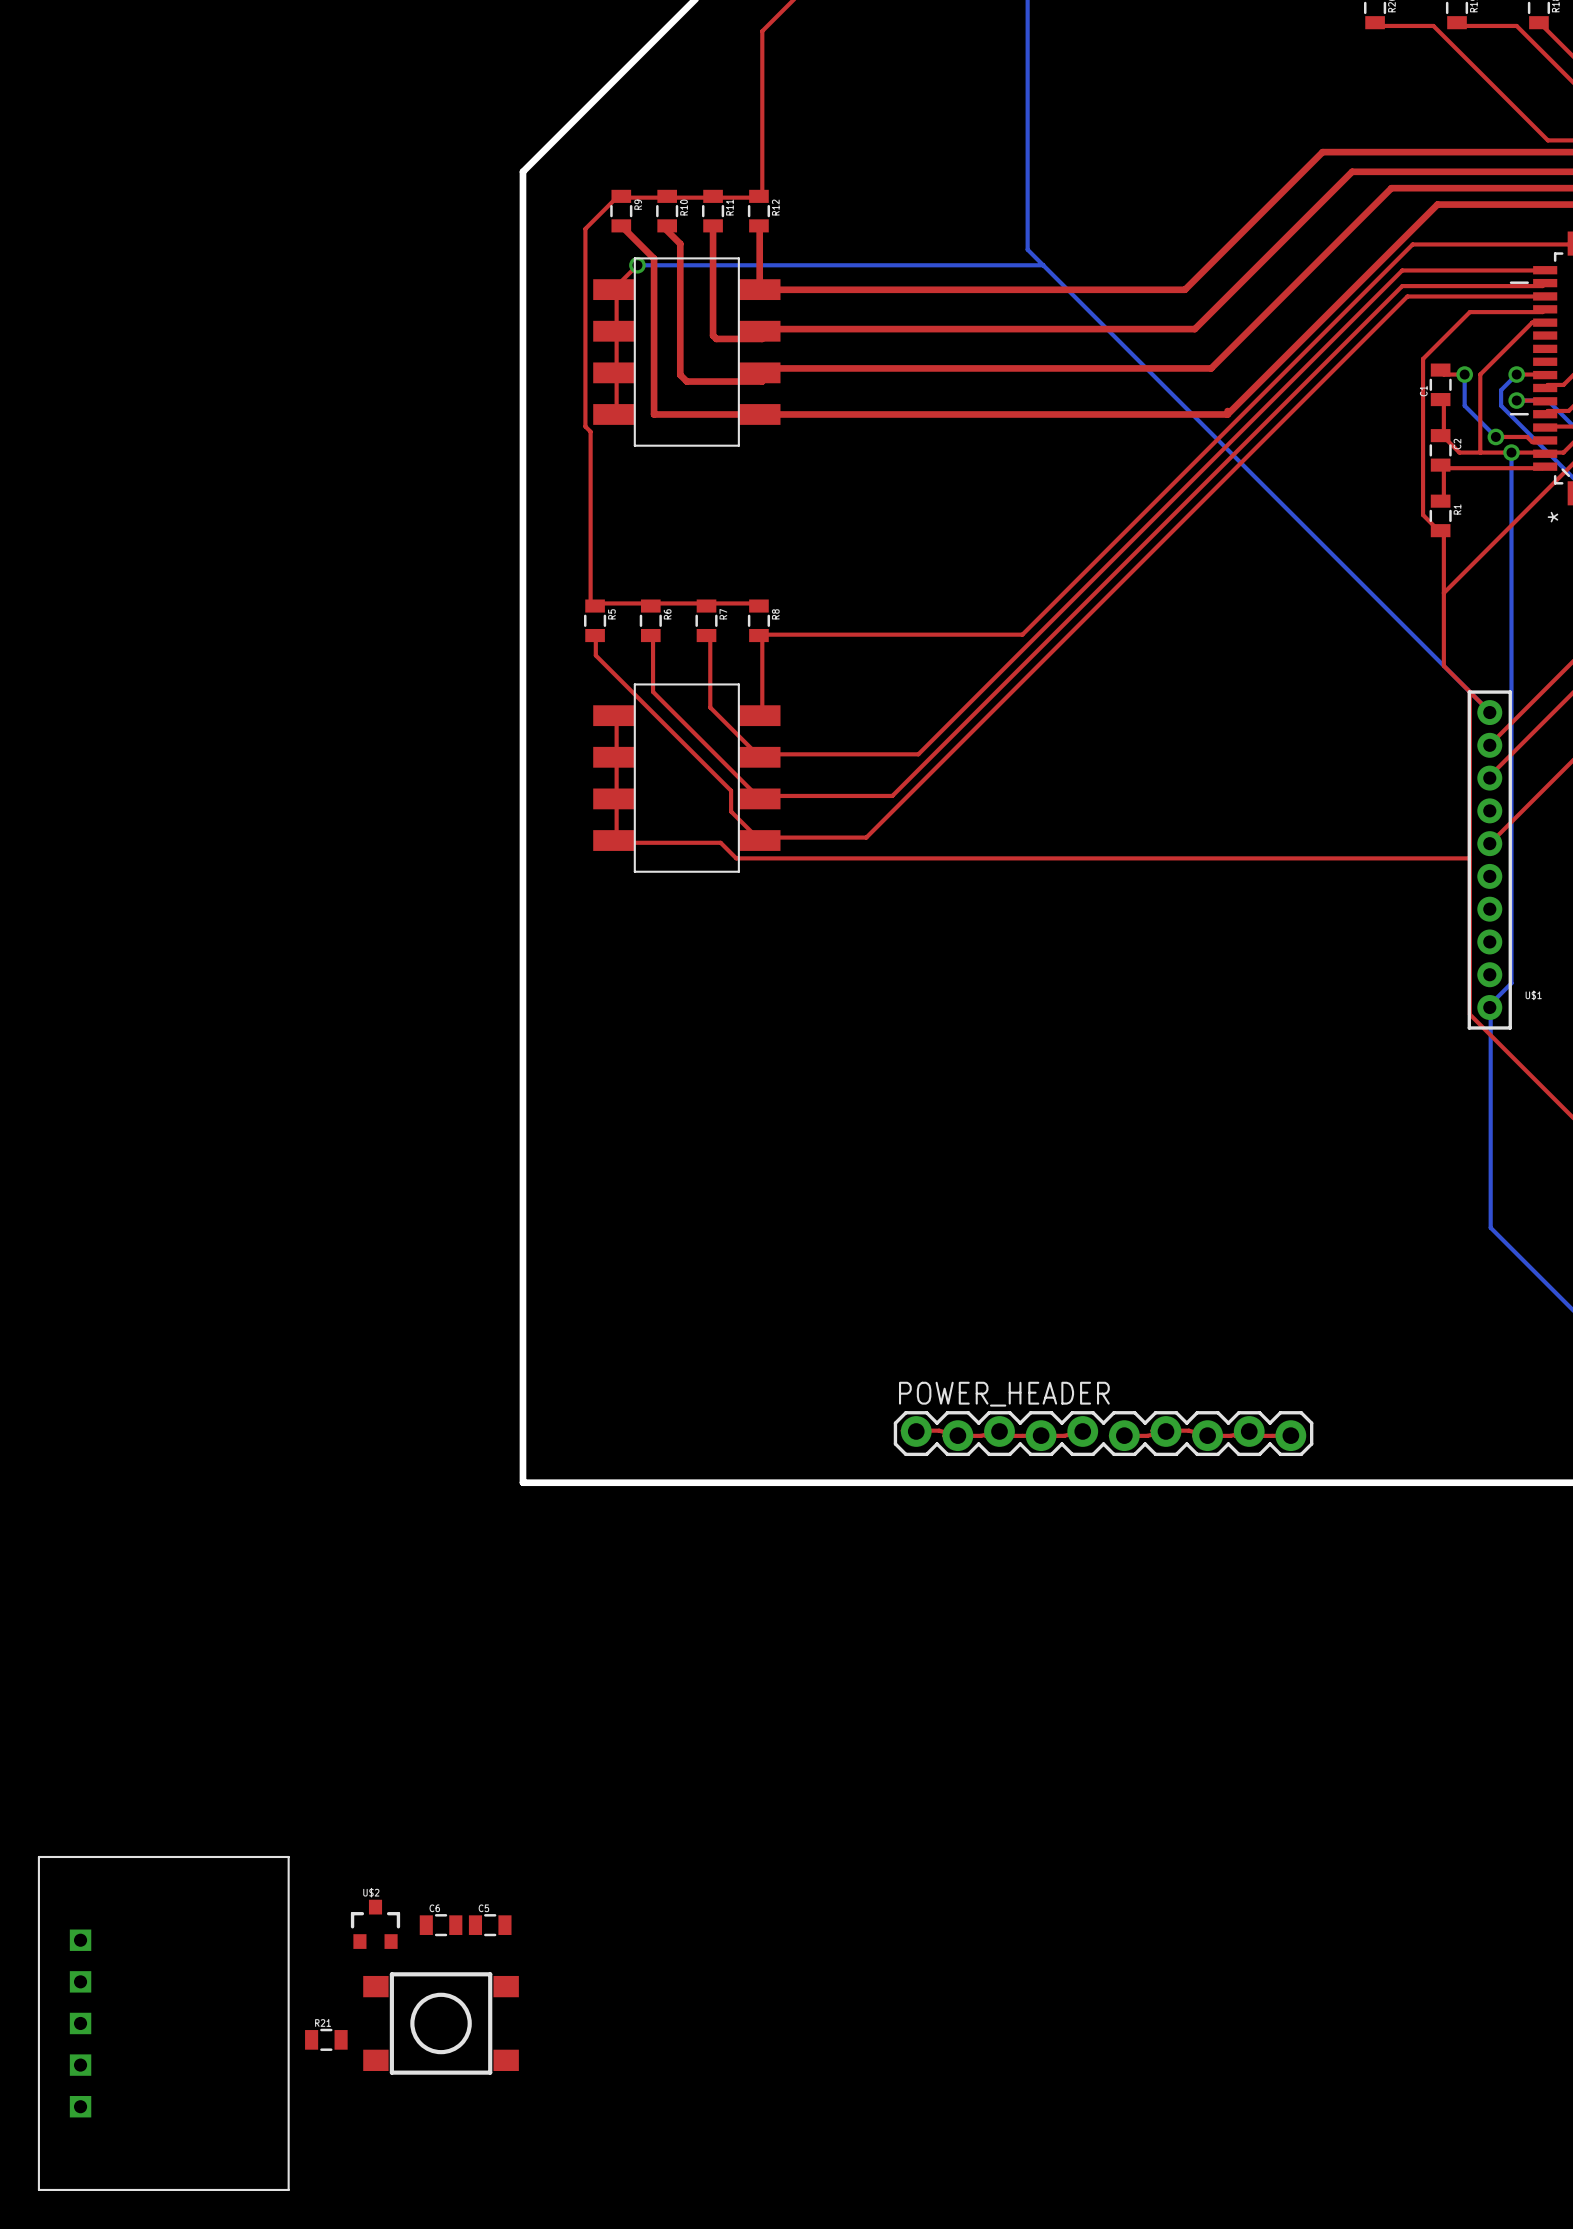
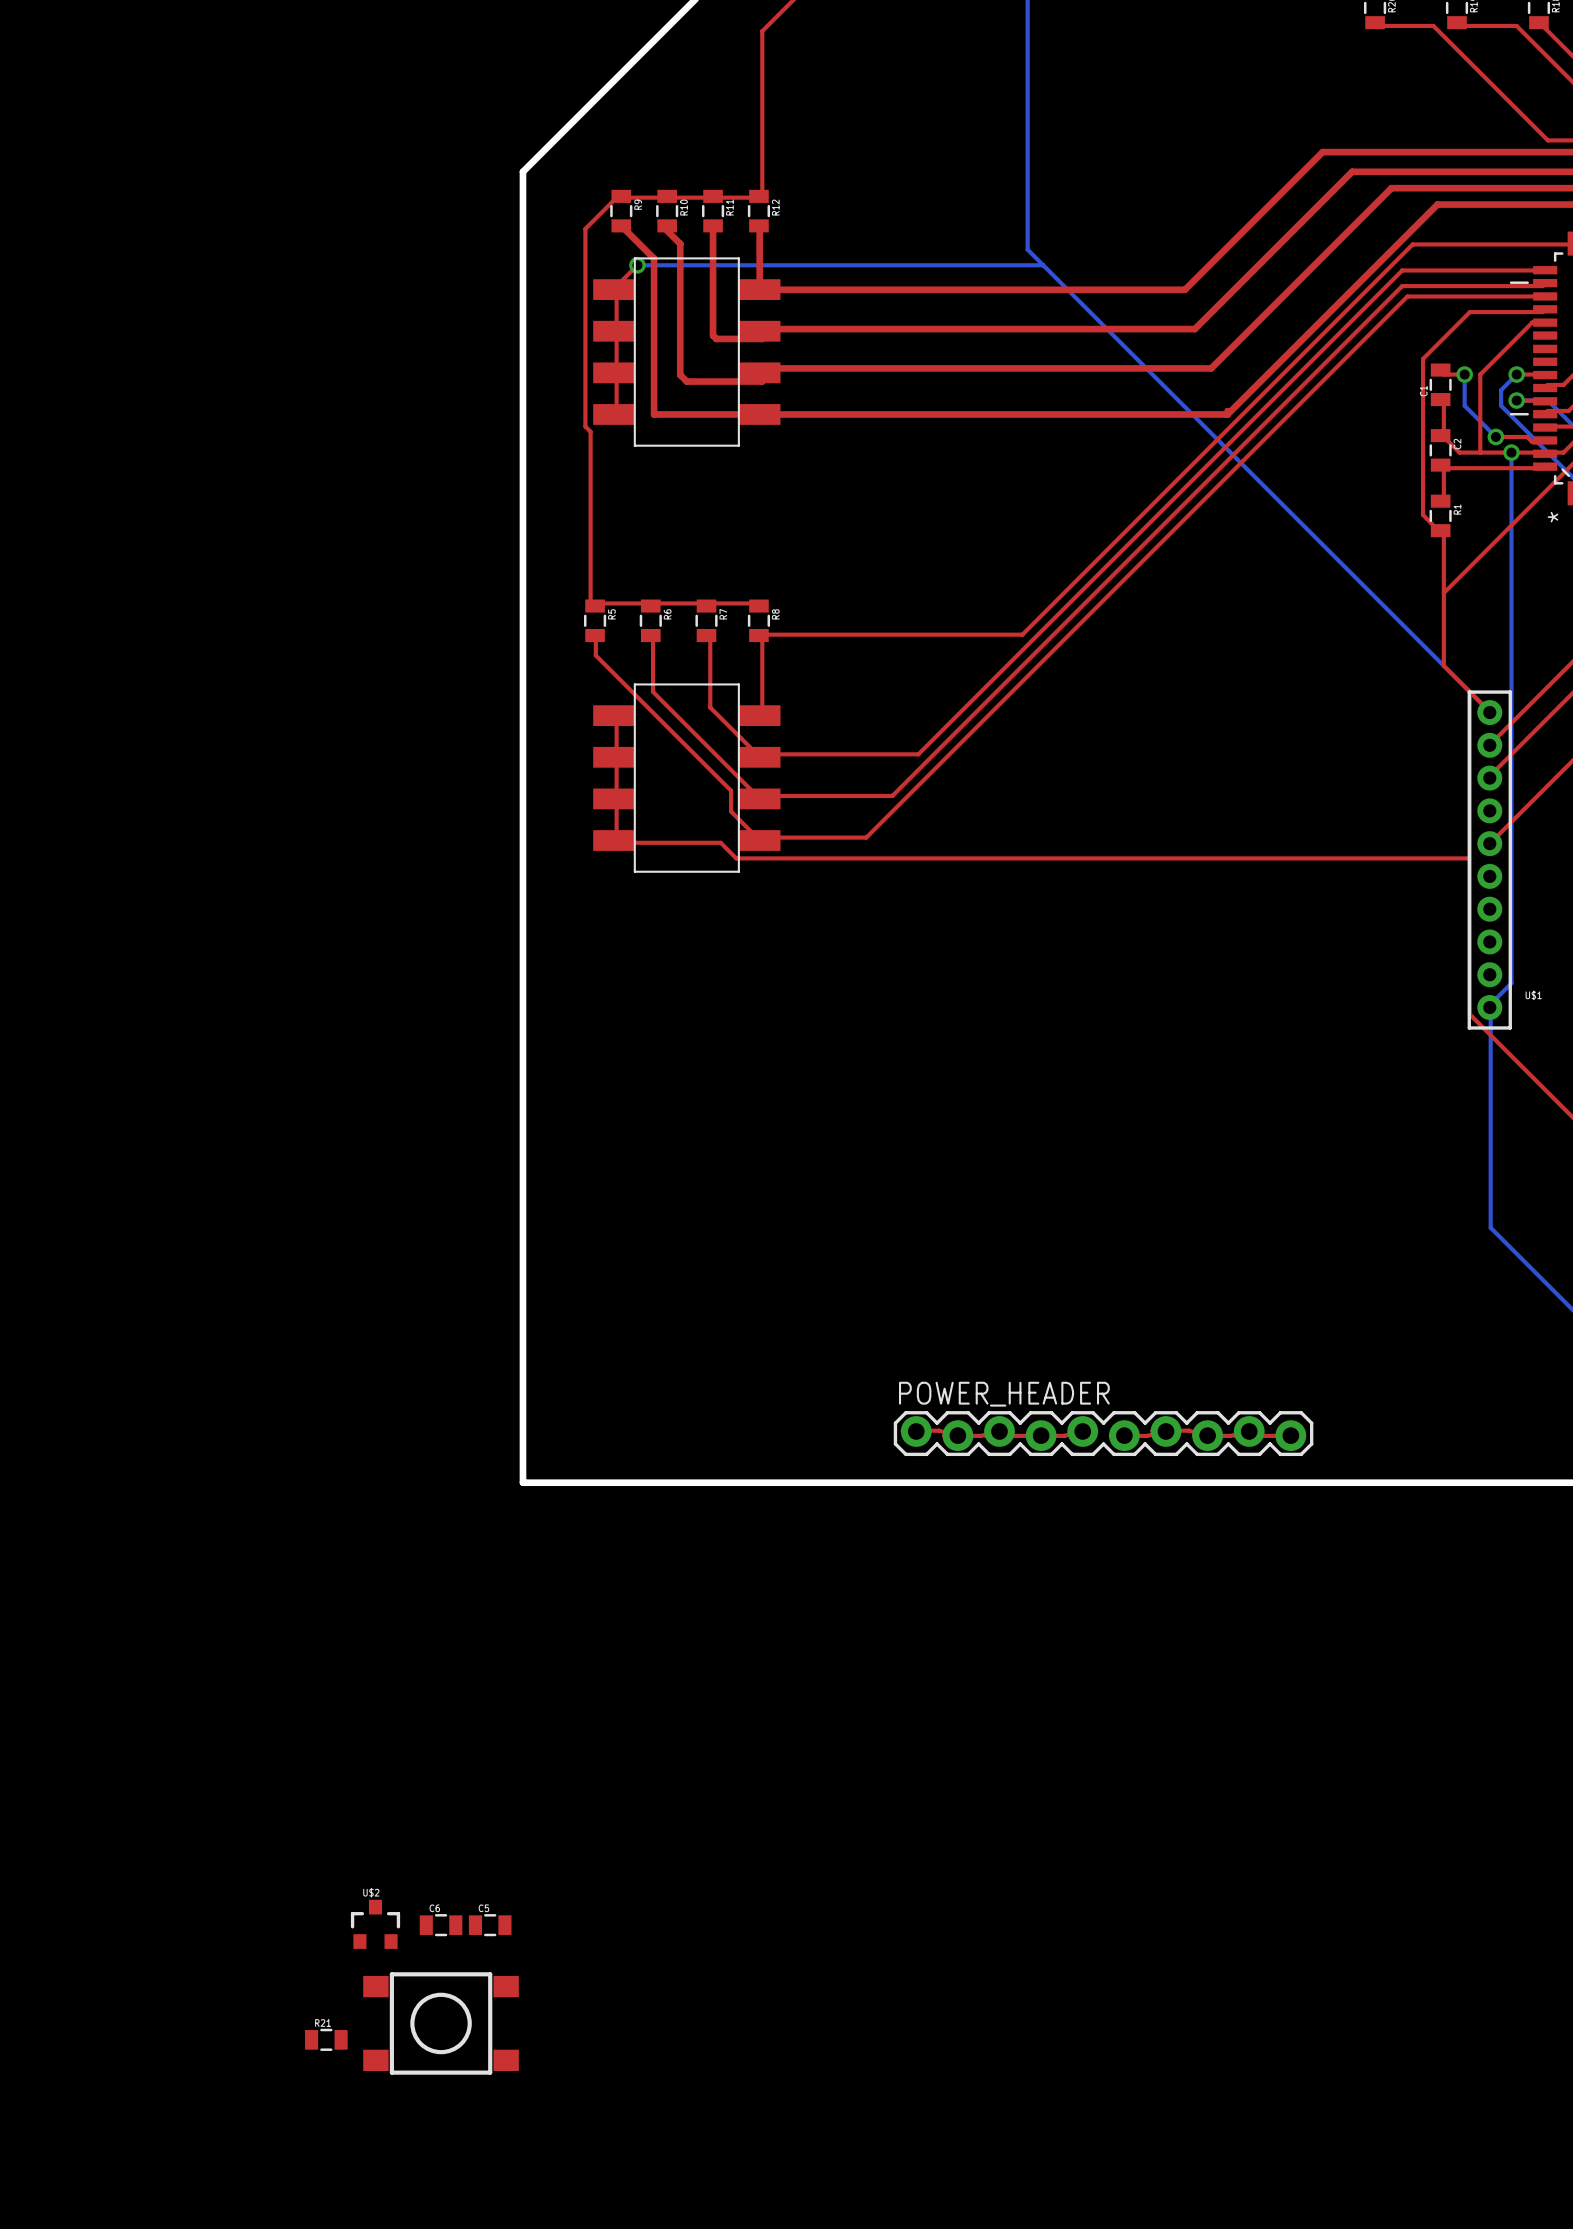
part: (163, 2023) -> none

